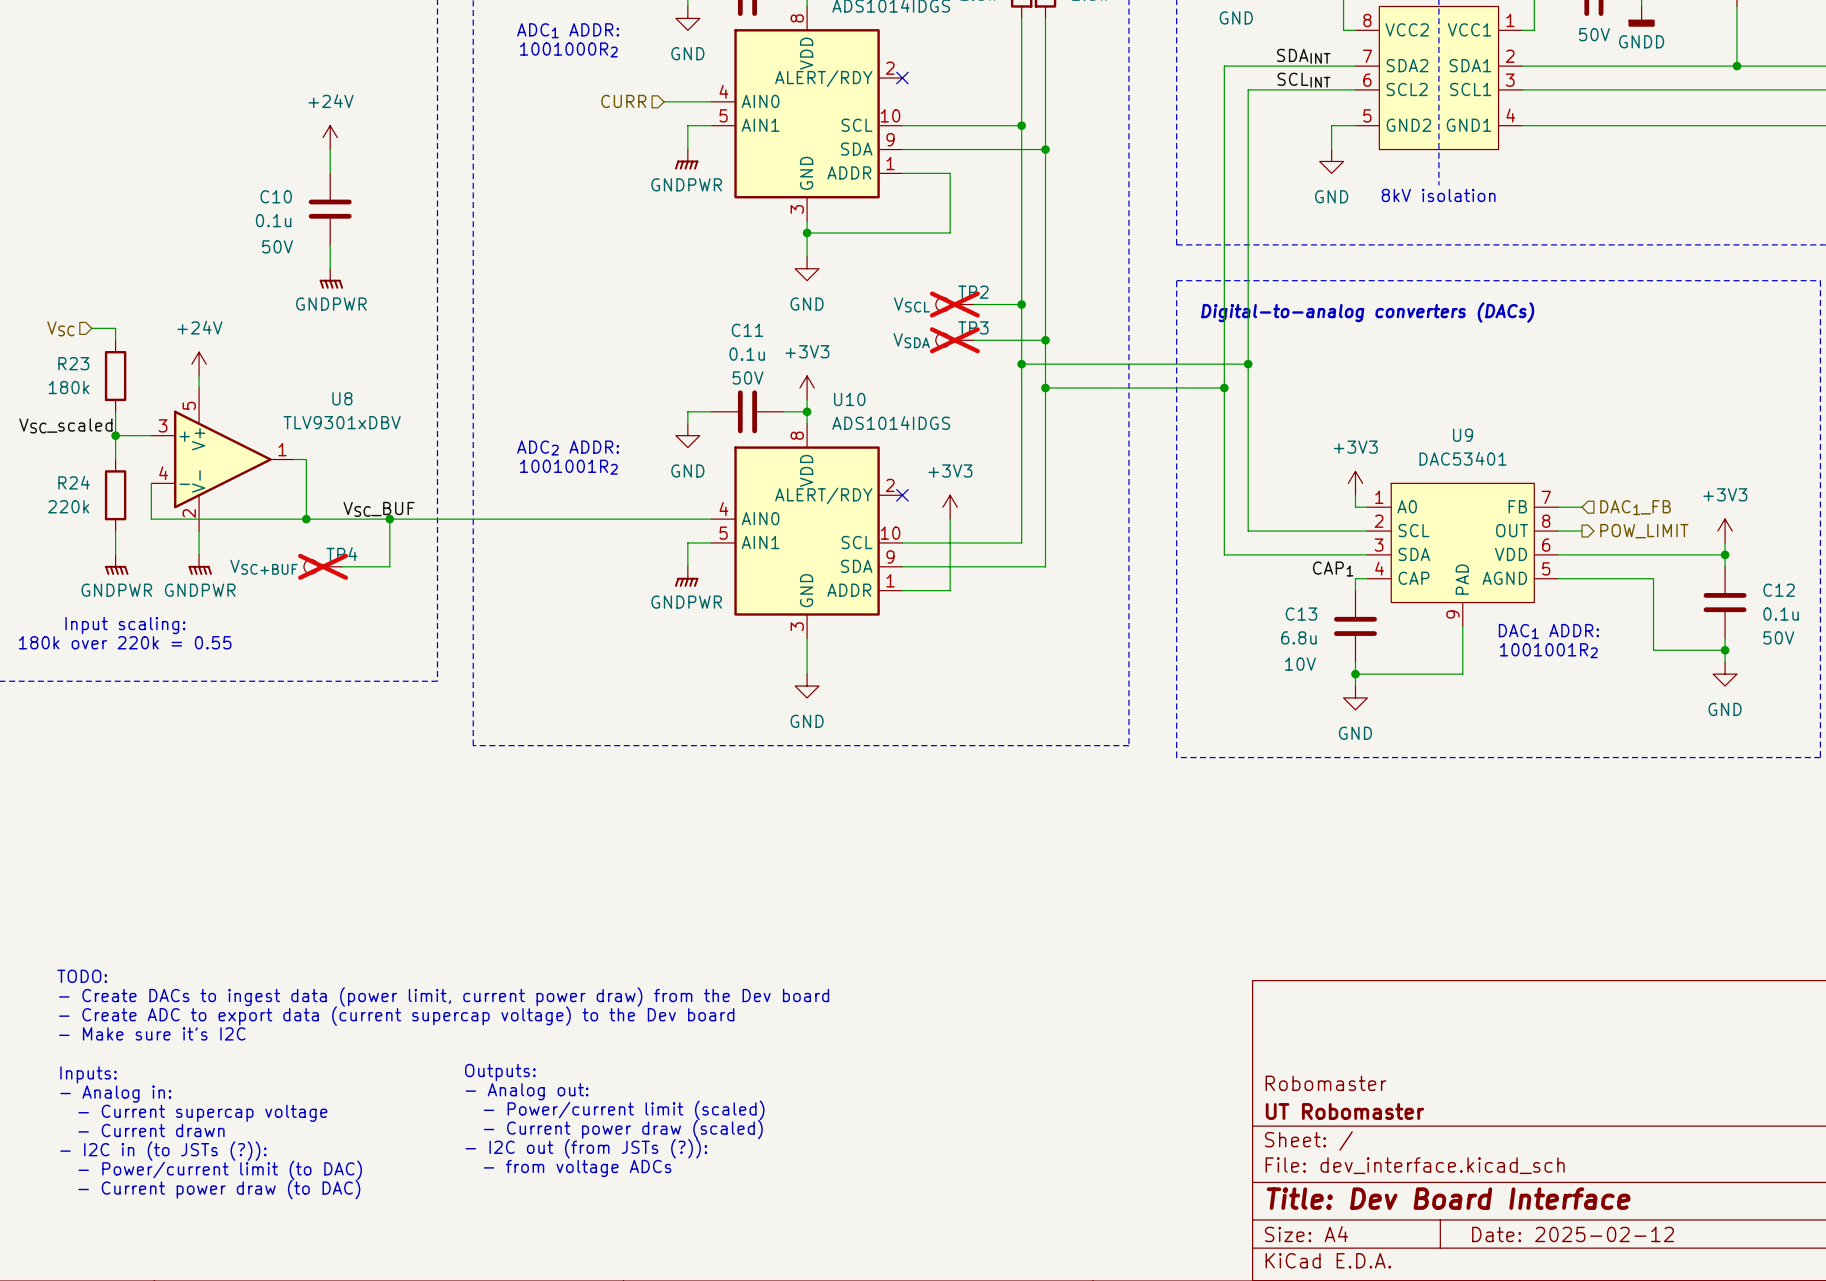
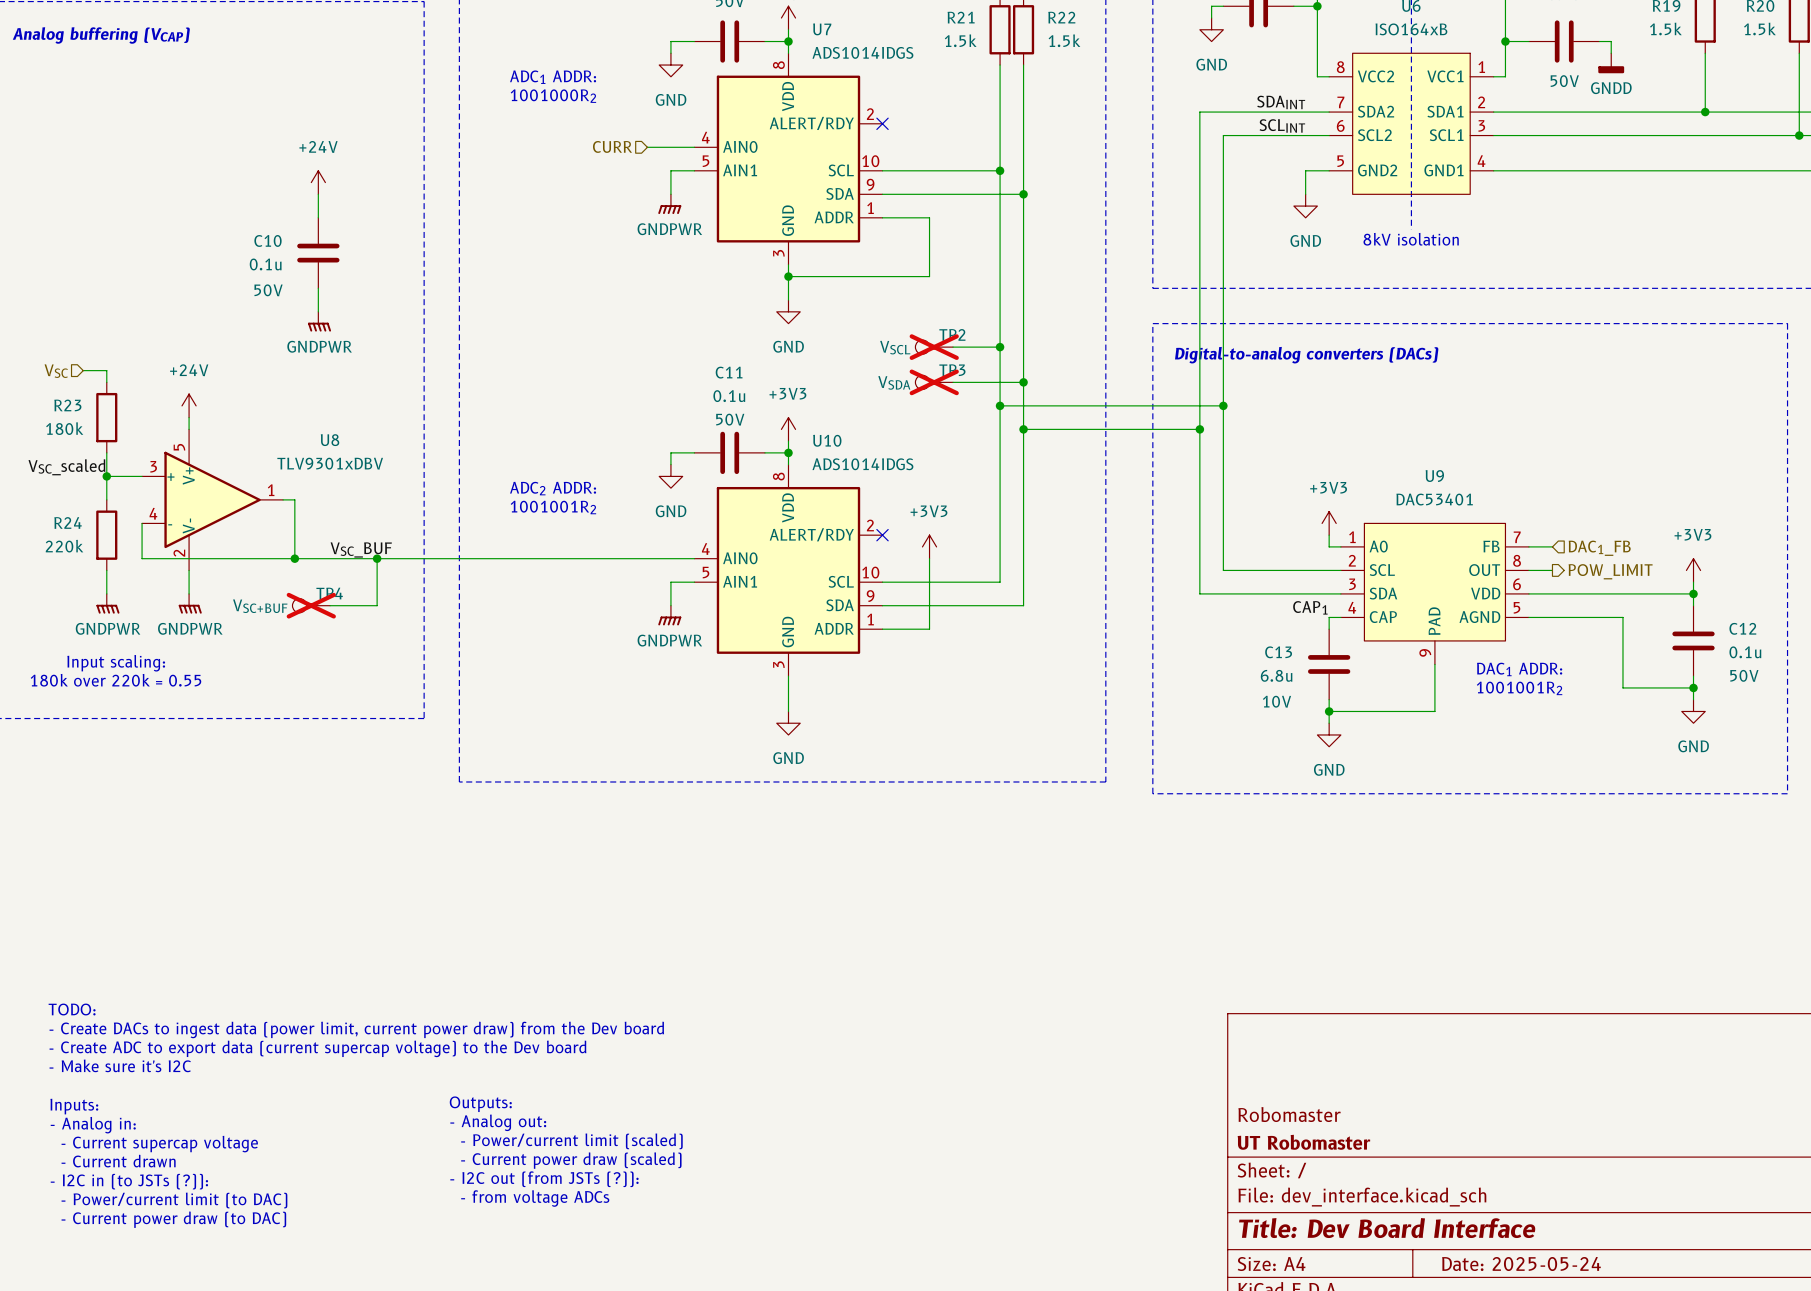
title block: Date: 2025-02-12 (1573, 1234) -> Date: 2025-05-24 (1521, 1264)

